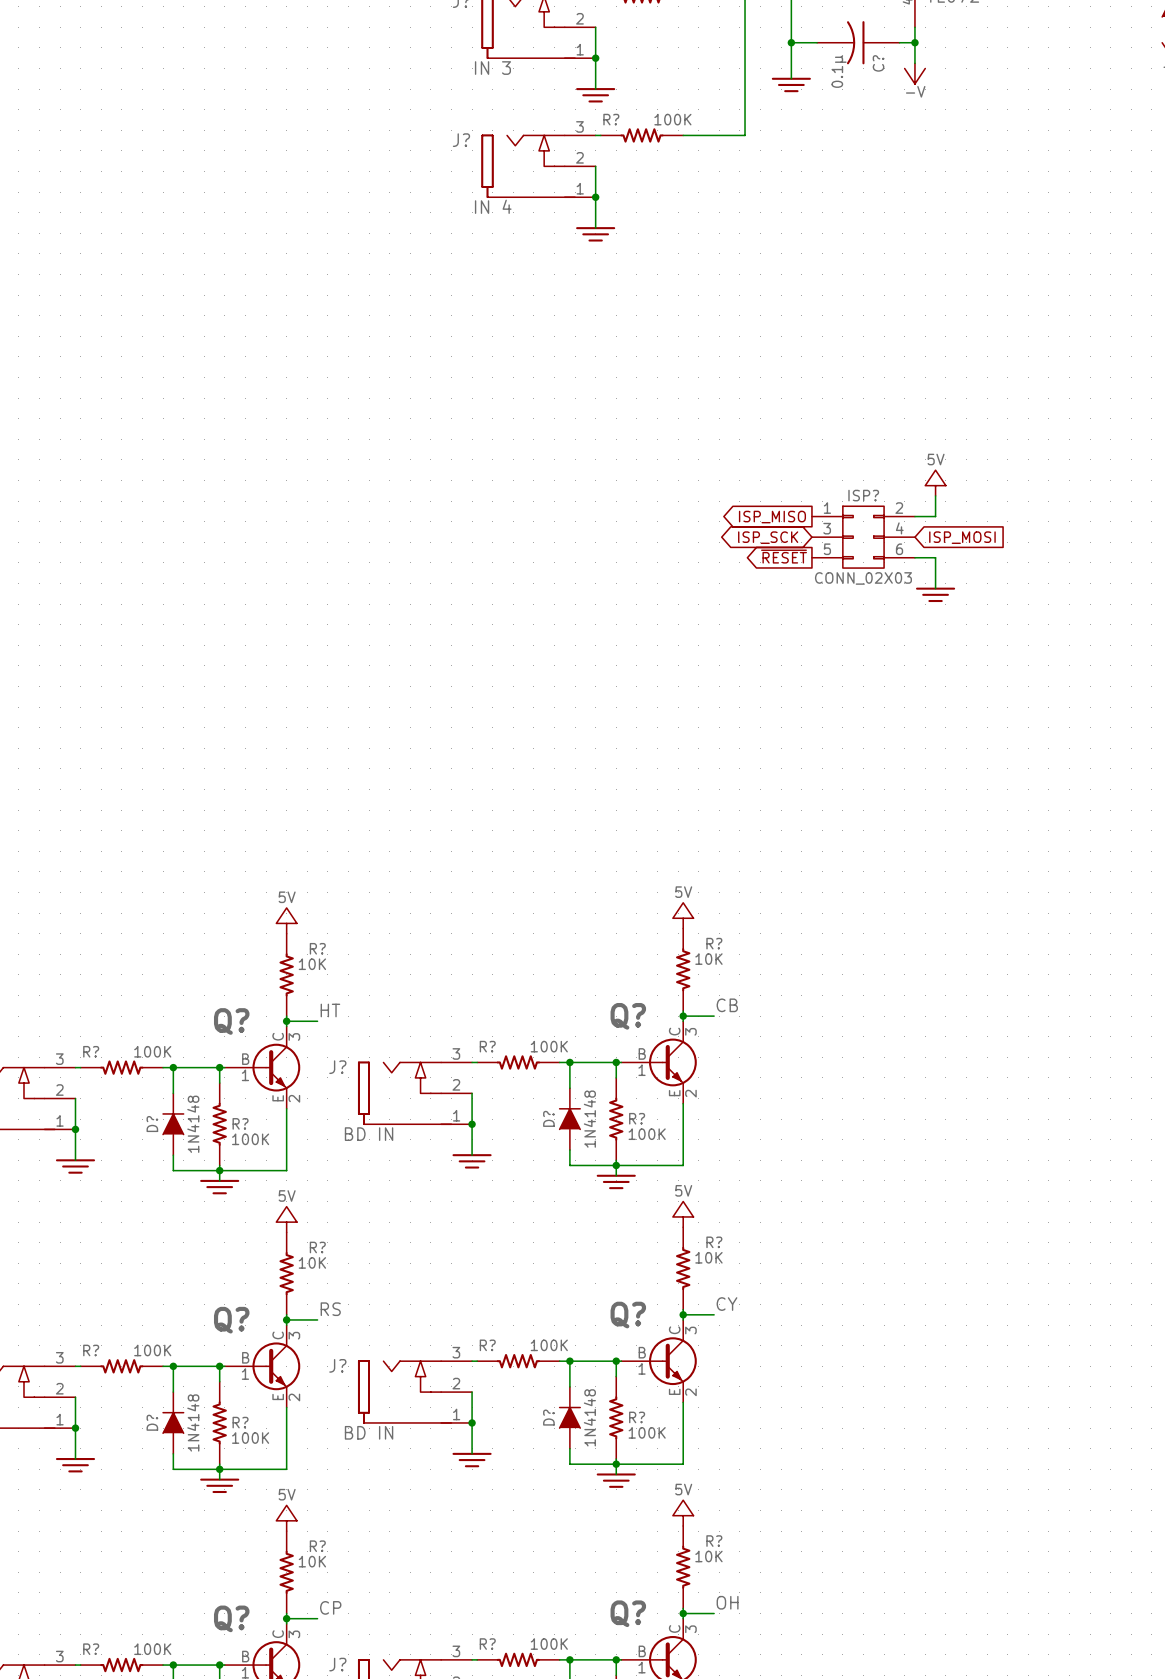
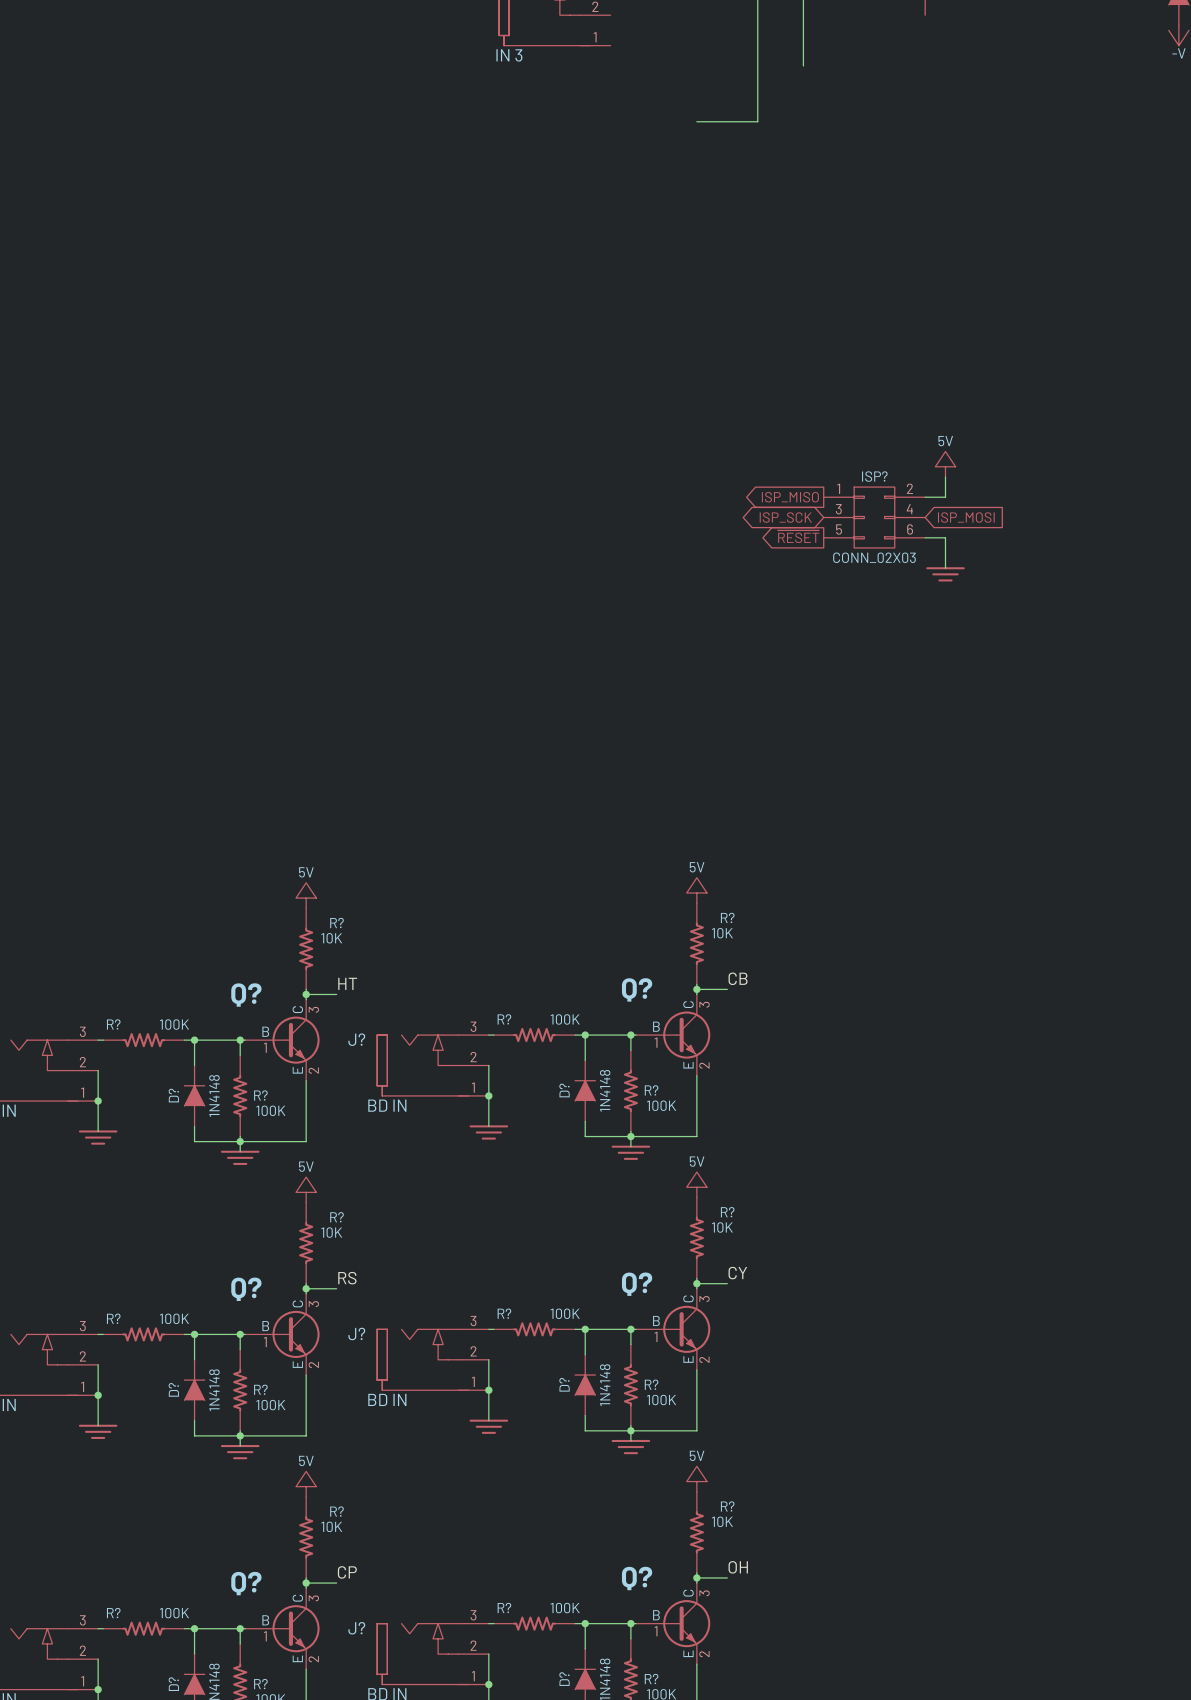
wire: (595, 27) (595, 89) -> none
wire: (914, 27) (914, 63) -> none
wire: (791, 42) (817, 42) -> none
junction: (791, 42) -> none
C?: 0.1µ (858, 42) -> none
wire: (899, 42) (914, 42) -> none
junction: (914, 42) -> none
junction: (595, 58) -> none
power symbol: -V (914, 73) -> none
power symbol: (791, 84) -> none
power symbol: (595, 95) -> none
wire: (595, 135) (600, 135) -> none
R?: 100K (642, 135) -> none
J?: IN 4 (539, 166) -> none
wire: (595, 166) (595, 228) -> none
junction: (595, 197) -> none
power symbol: (595, 234) -> none

